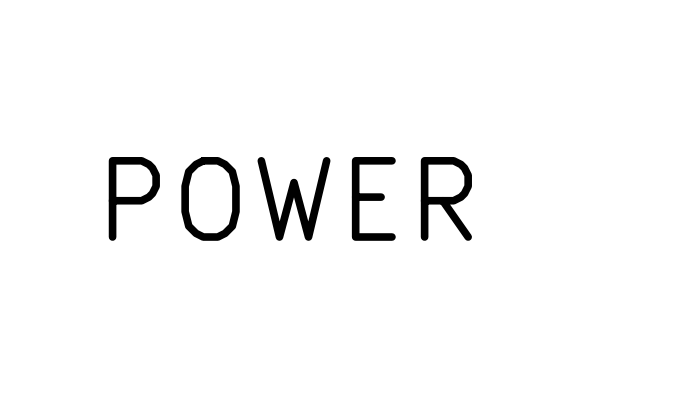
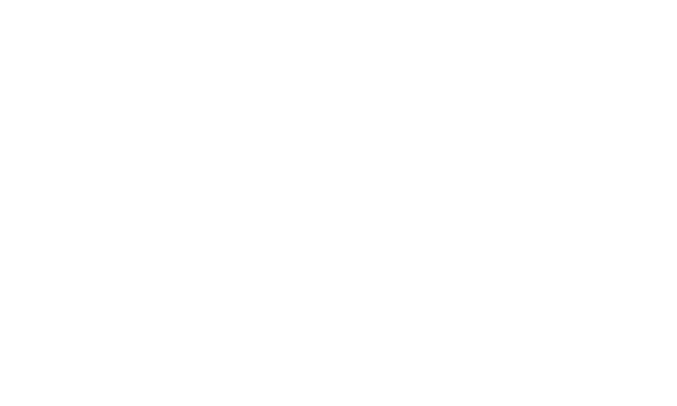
label: POWER (290, 198) -> none

